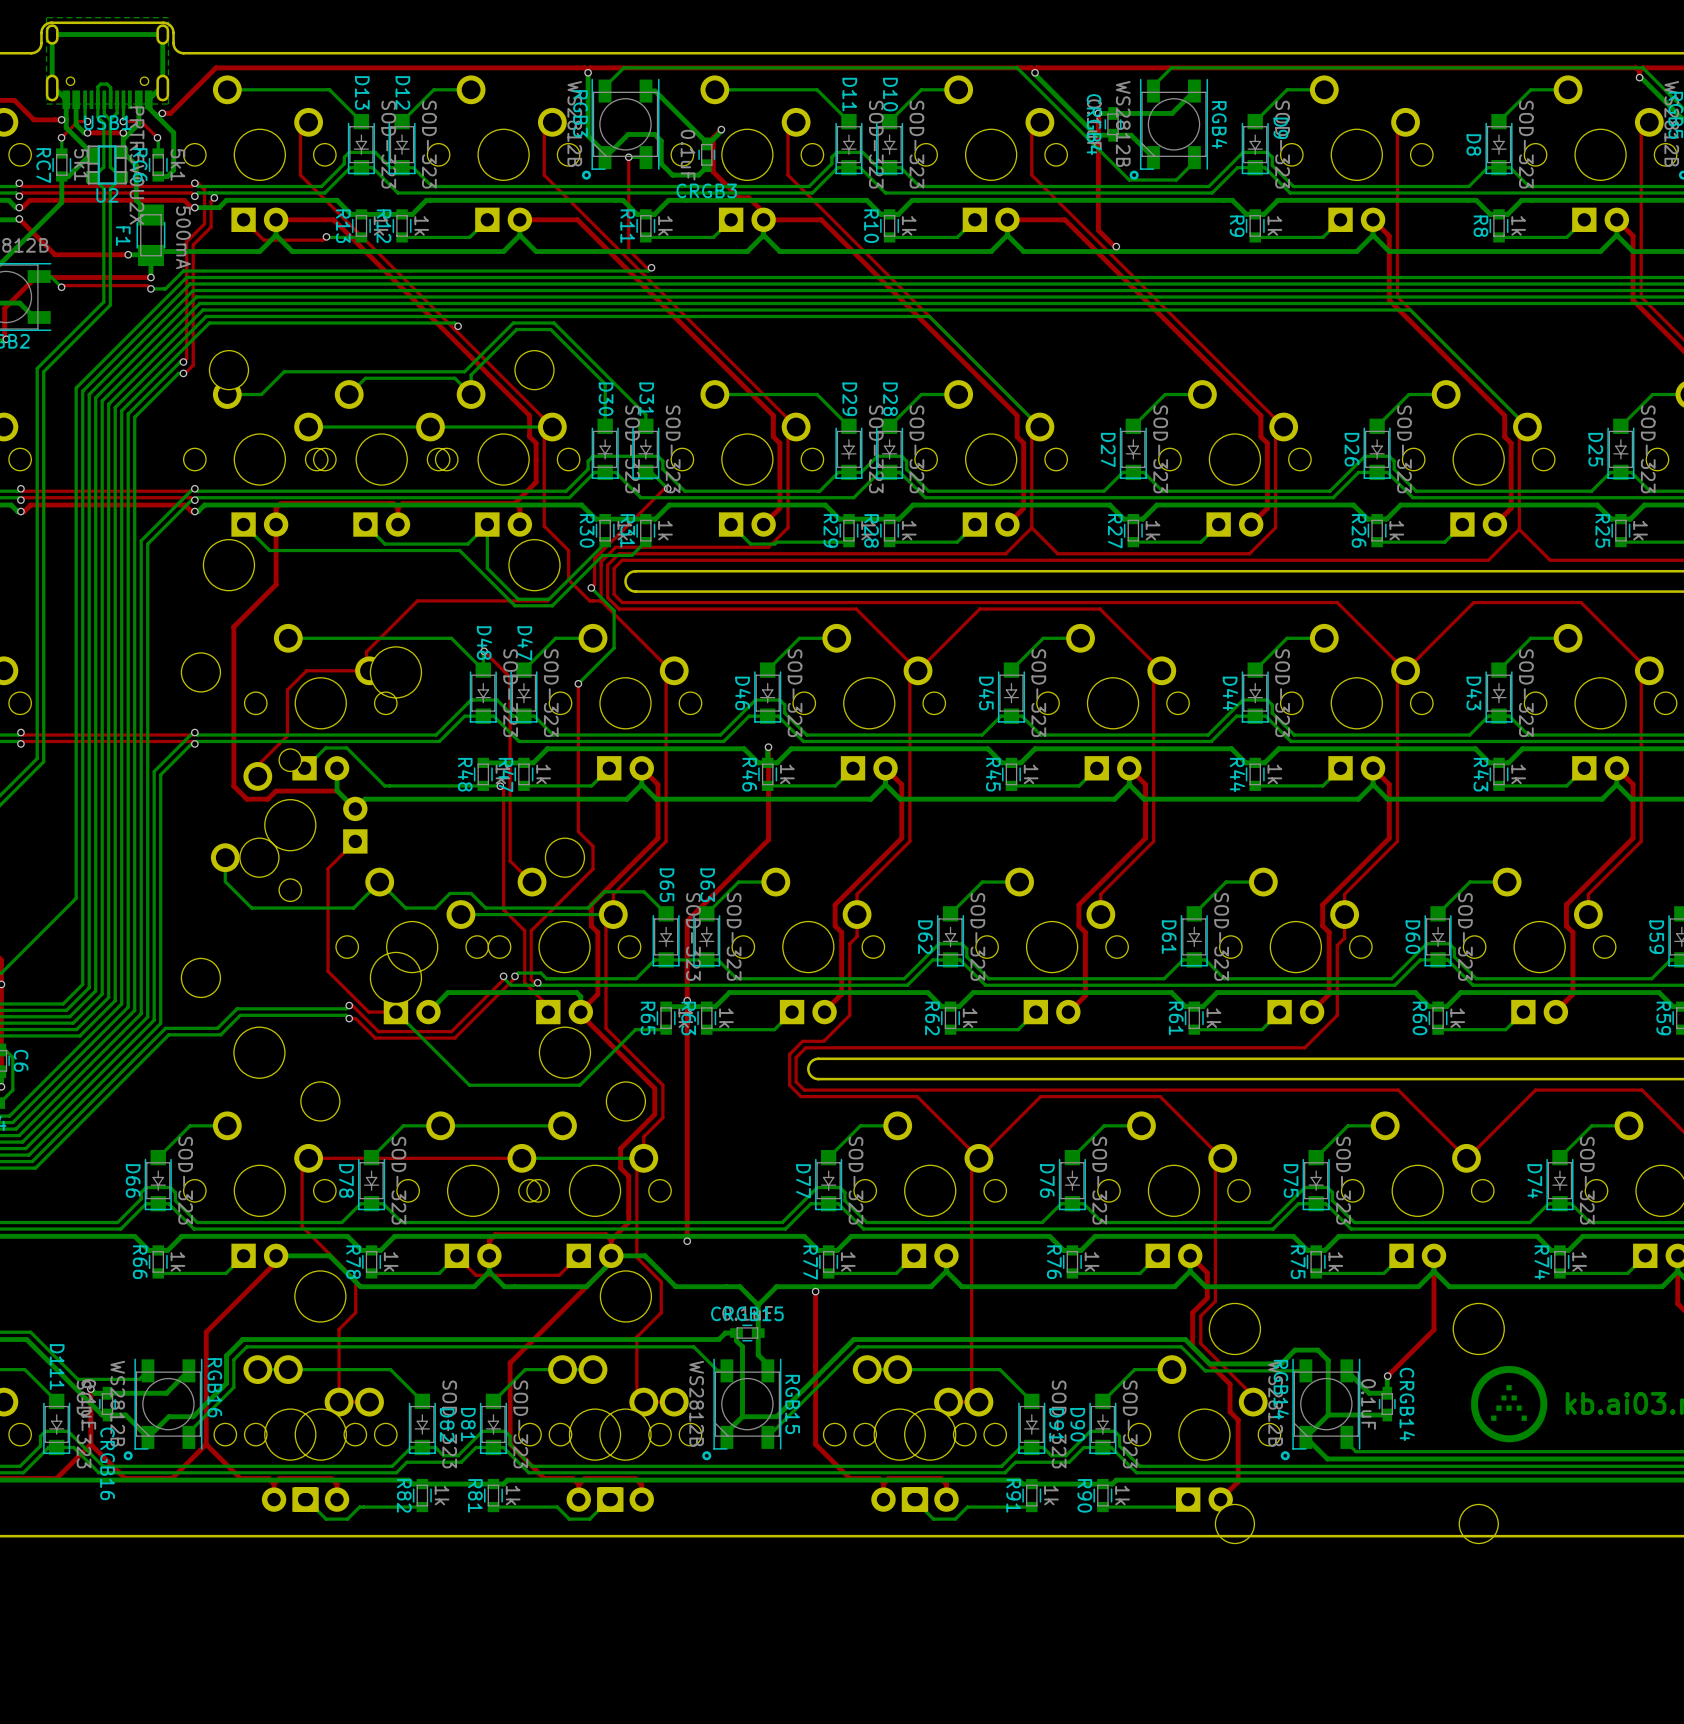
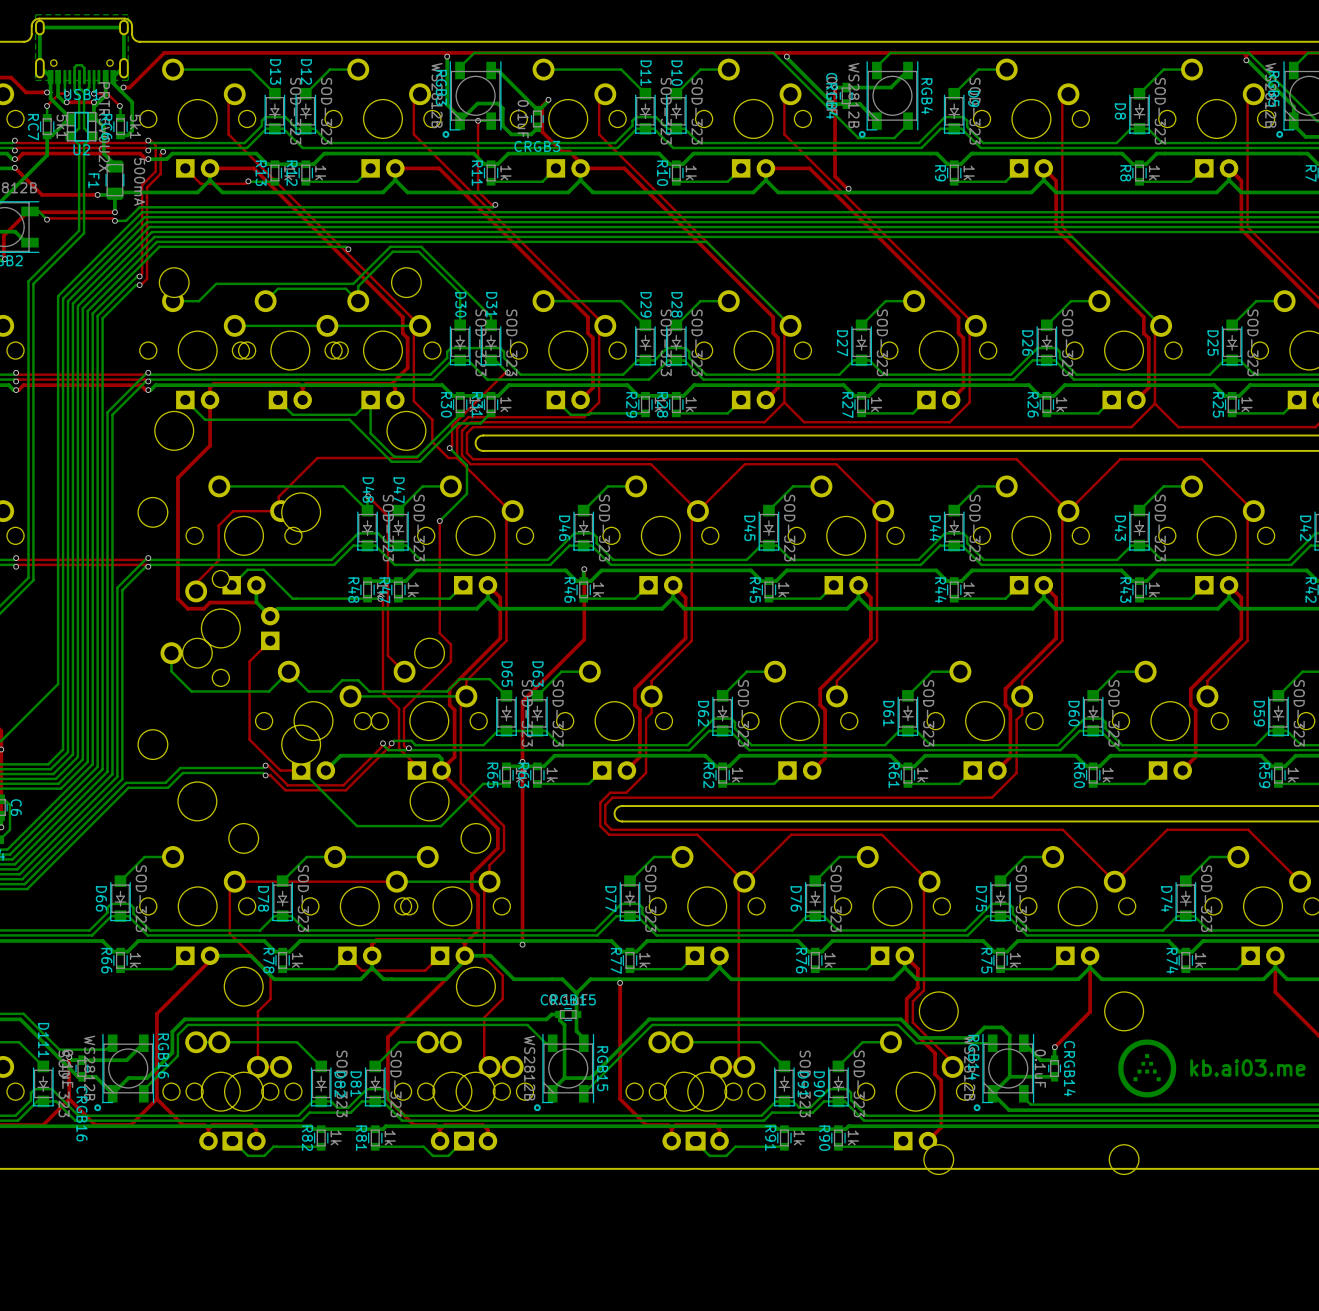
F1 footprint: [136, 204, 166, 267] -> [105, 160, 125, 200]

